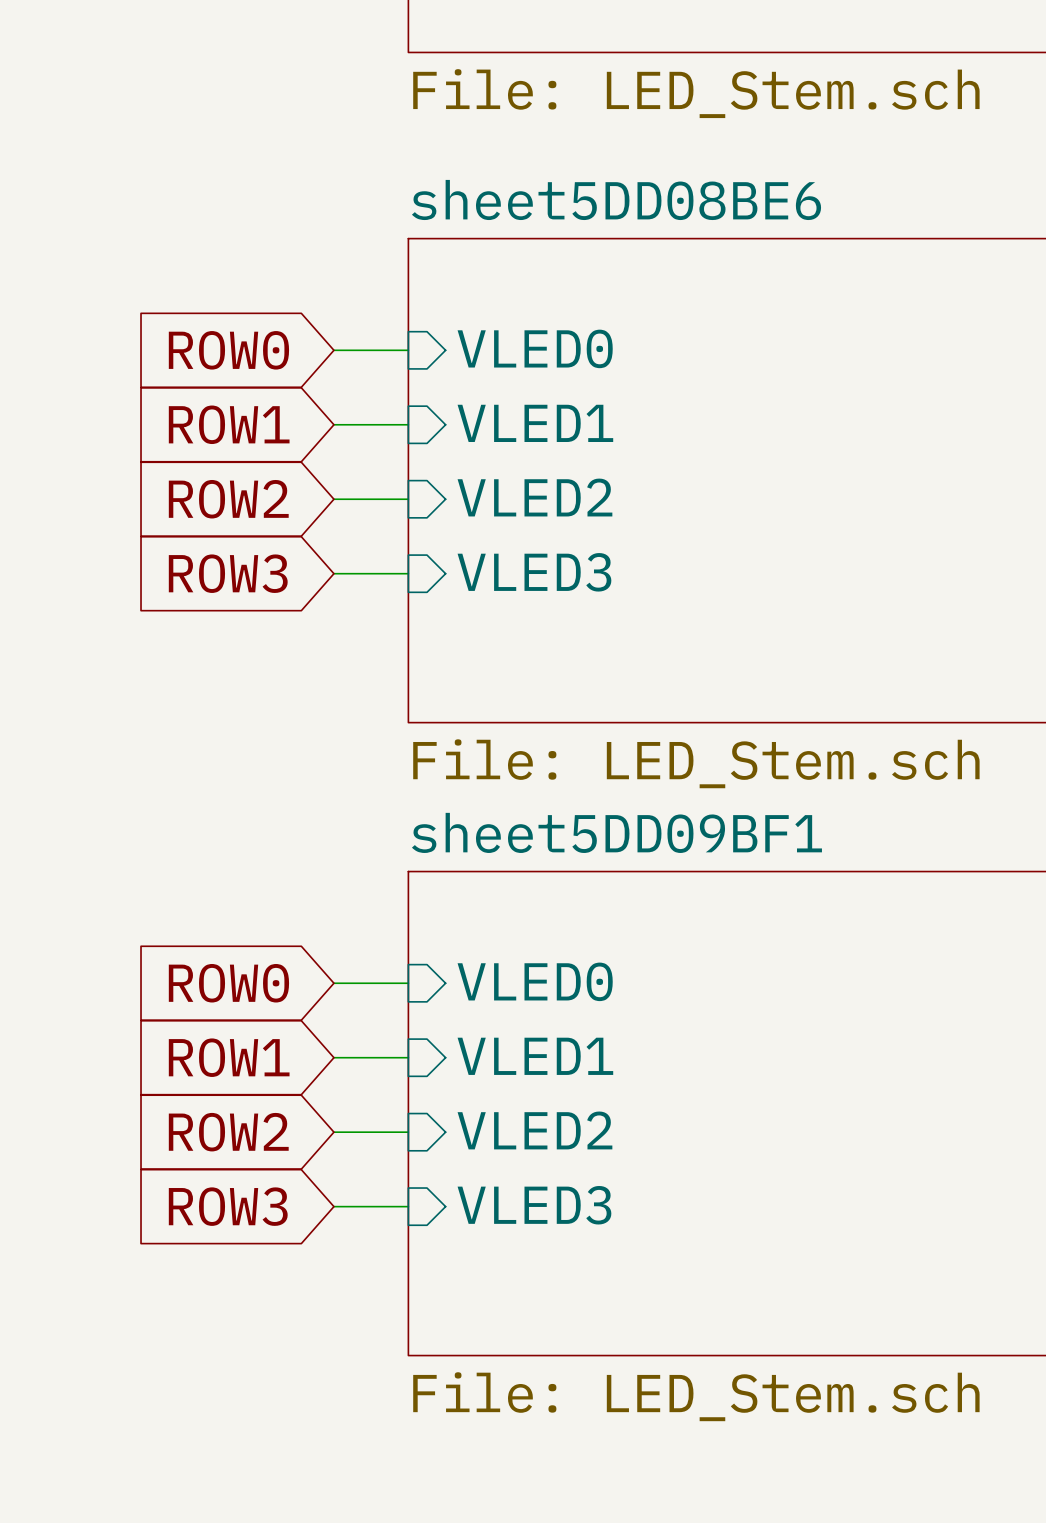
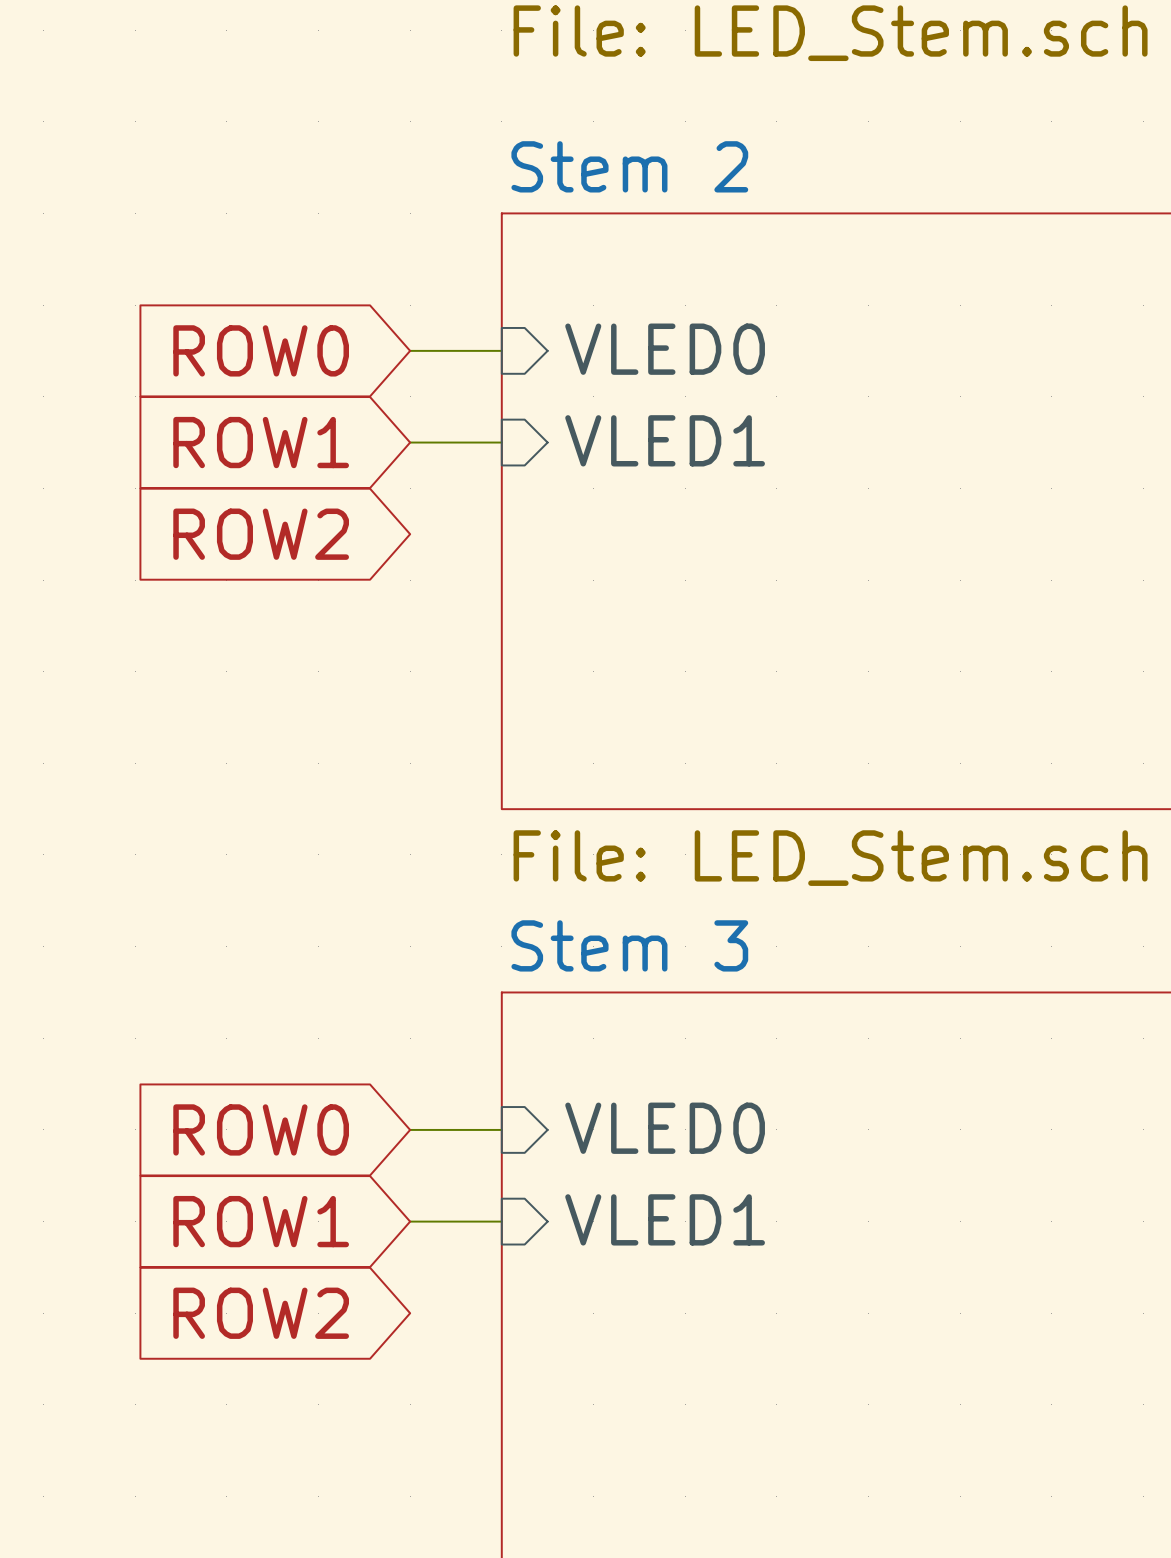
sheet sheet5DD08BE6 name: sheet5DD08BE6 (616, 199) -> Stem 2 (629, 166)
sheet pin: VLED2 (534, 497) -> none
wire: (333, 499) (408, 499) -> none
sheet pin: VLED3 (534, 572) -> none
global label: ROW3 (228, 573) -> none
wire: (333, 573) (408, 573) -> none
sheet sheet5DD09BF1 name: sheet5DD09BF1 (616, 832) -> Stem 3 (629, 945)
sheet pin: VLED2 (534, 1130) -> none
wire: (333, 1132) (408, 1132) -> none
sheet pin: VLED3 (534, 1205) -> none
global label: ROW3 (228, 1206) -> none
wire: (333, 1206) (408, 1206) -> none

